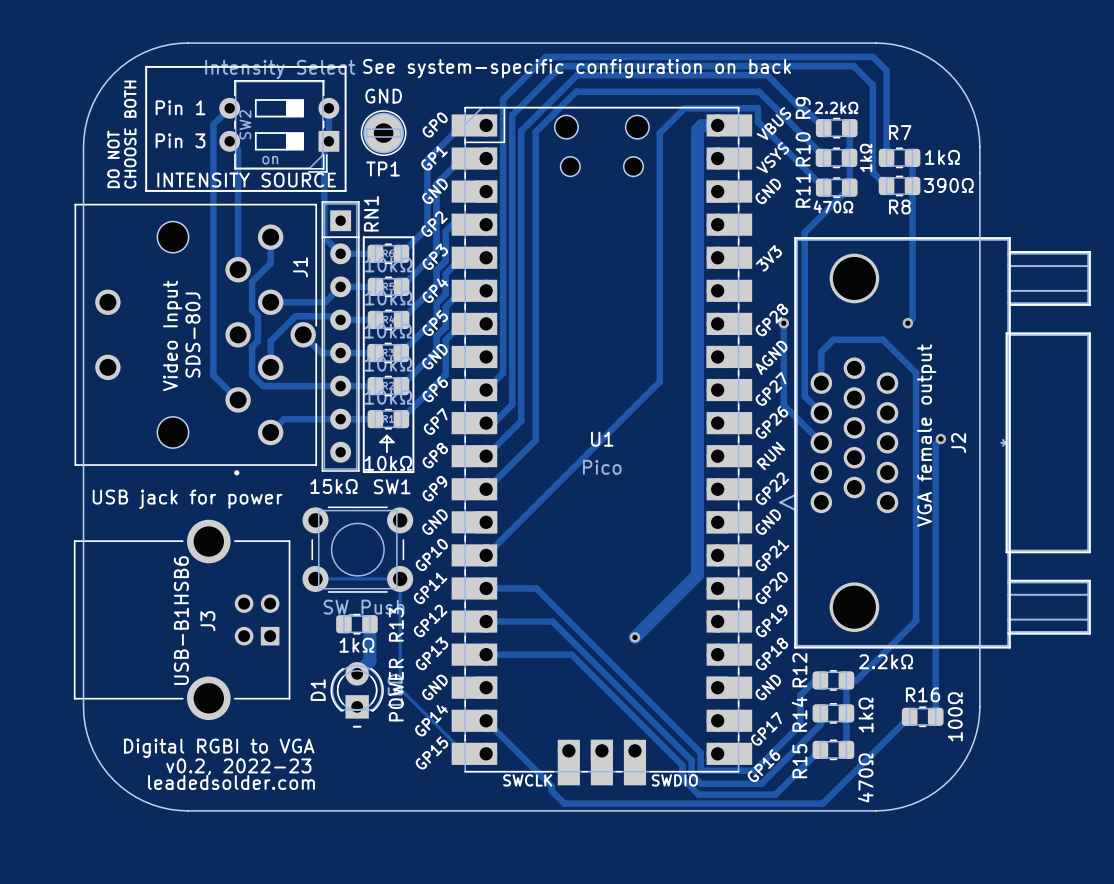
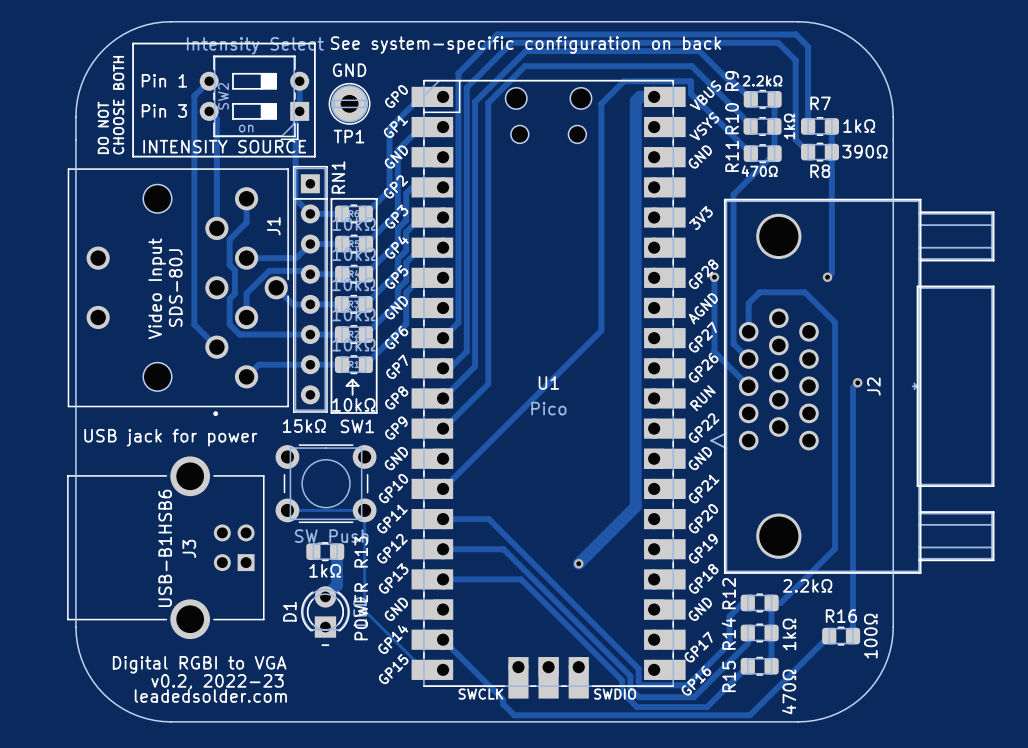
text: VGA female output (926, 435) -> none

